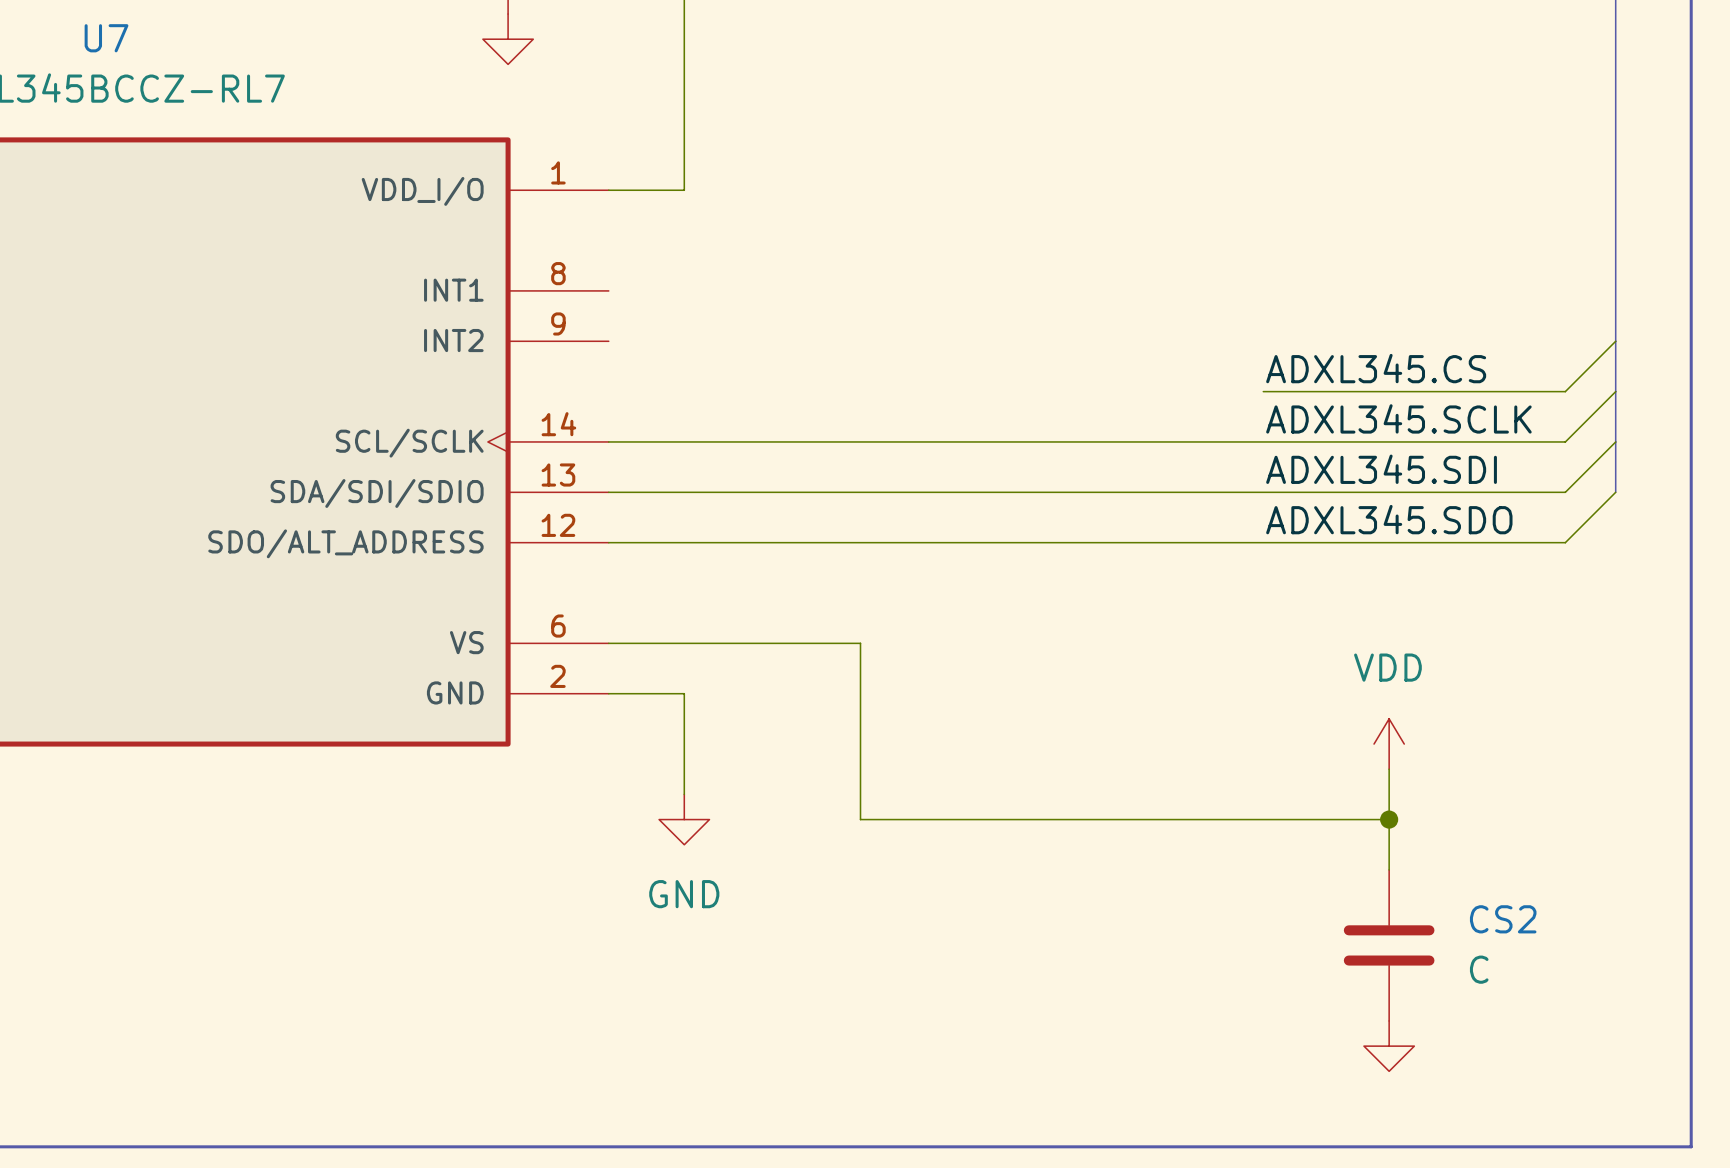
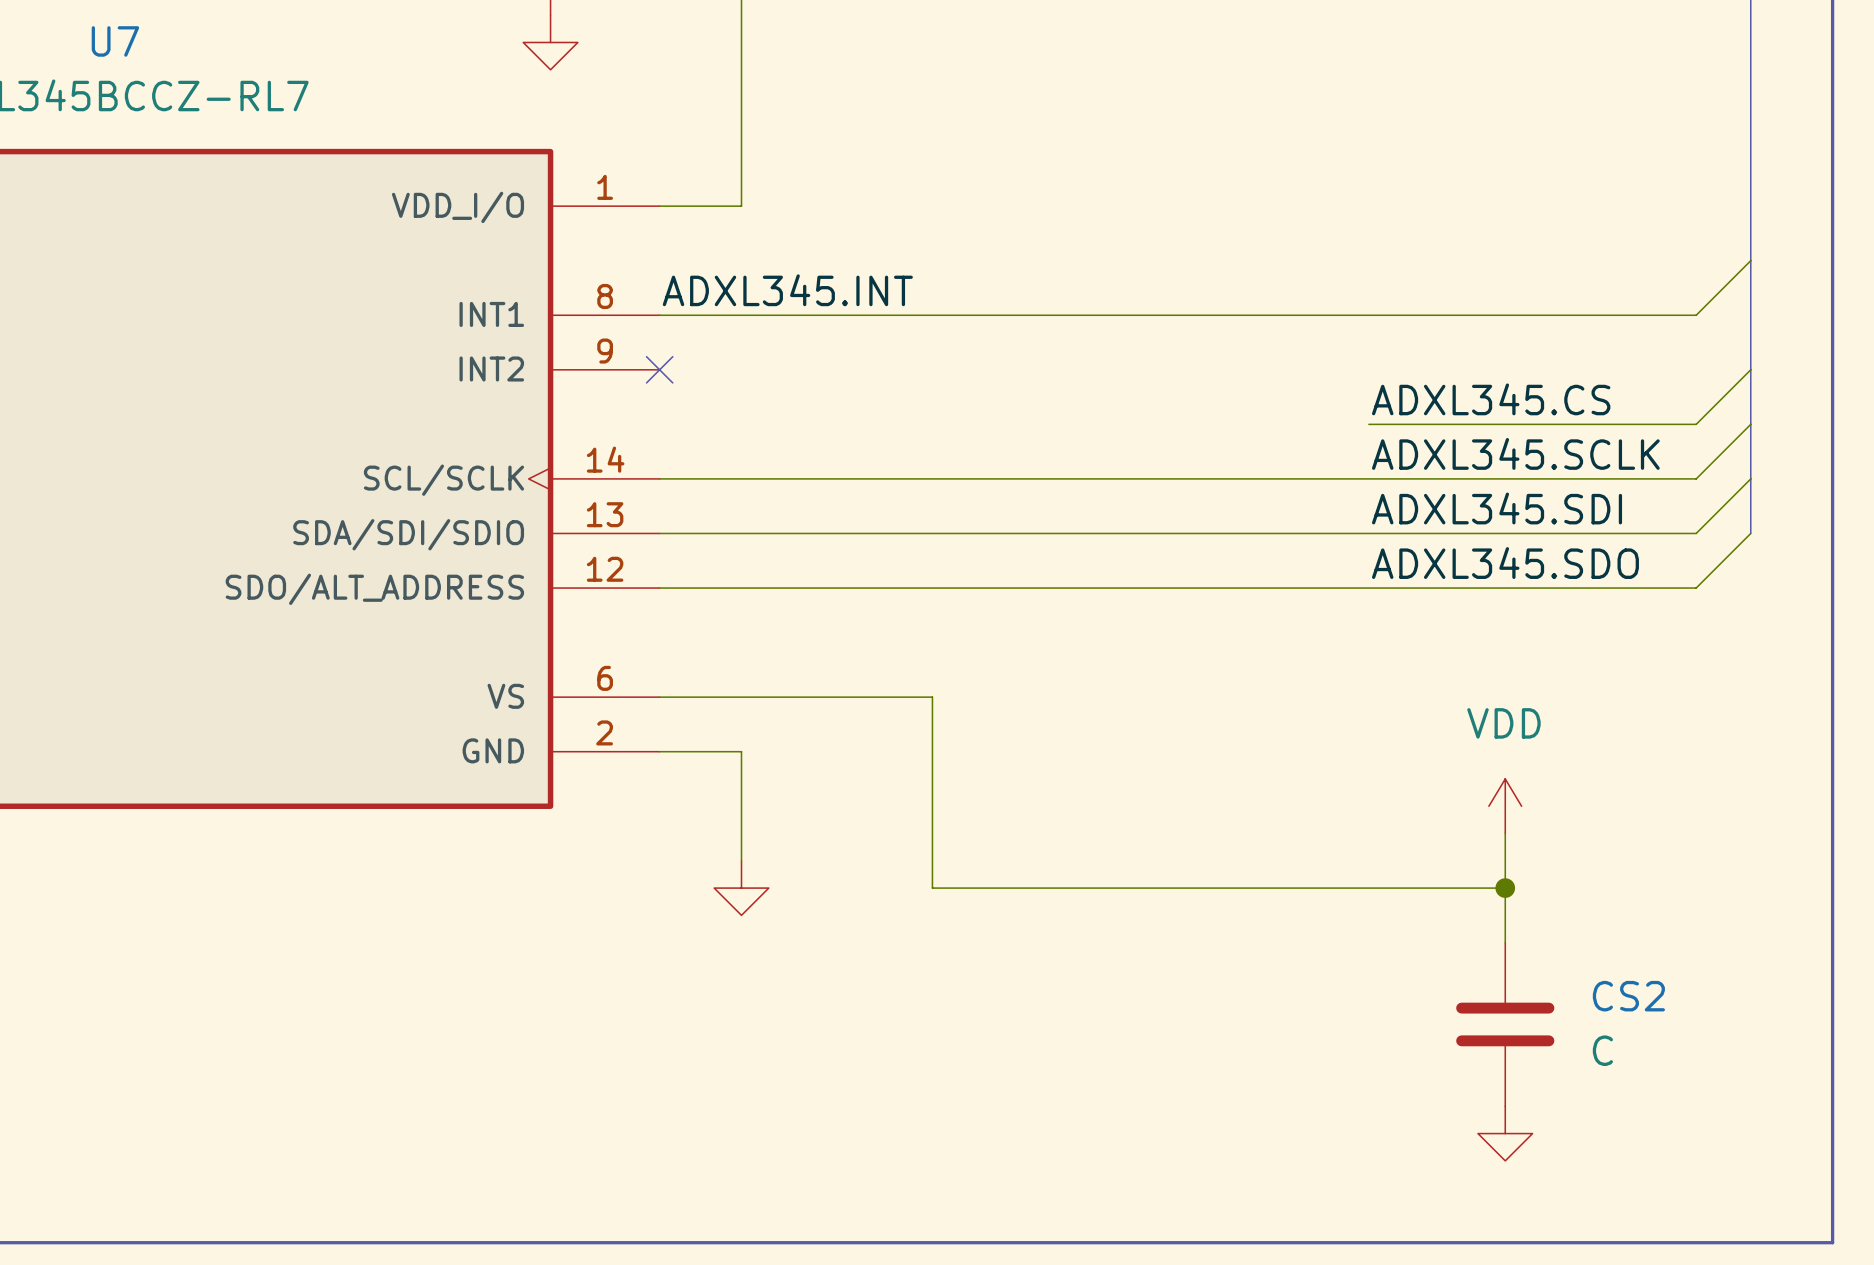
wire: none -> (1750, 260) (1696, 315) (659, 315)
label: none -> ADXL345.INT (787, 290)
no-connect mark: none -> (659, 369)
power symbol text: GND (684, 894) -> none

